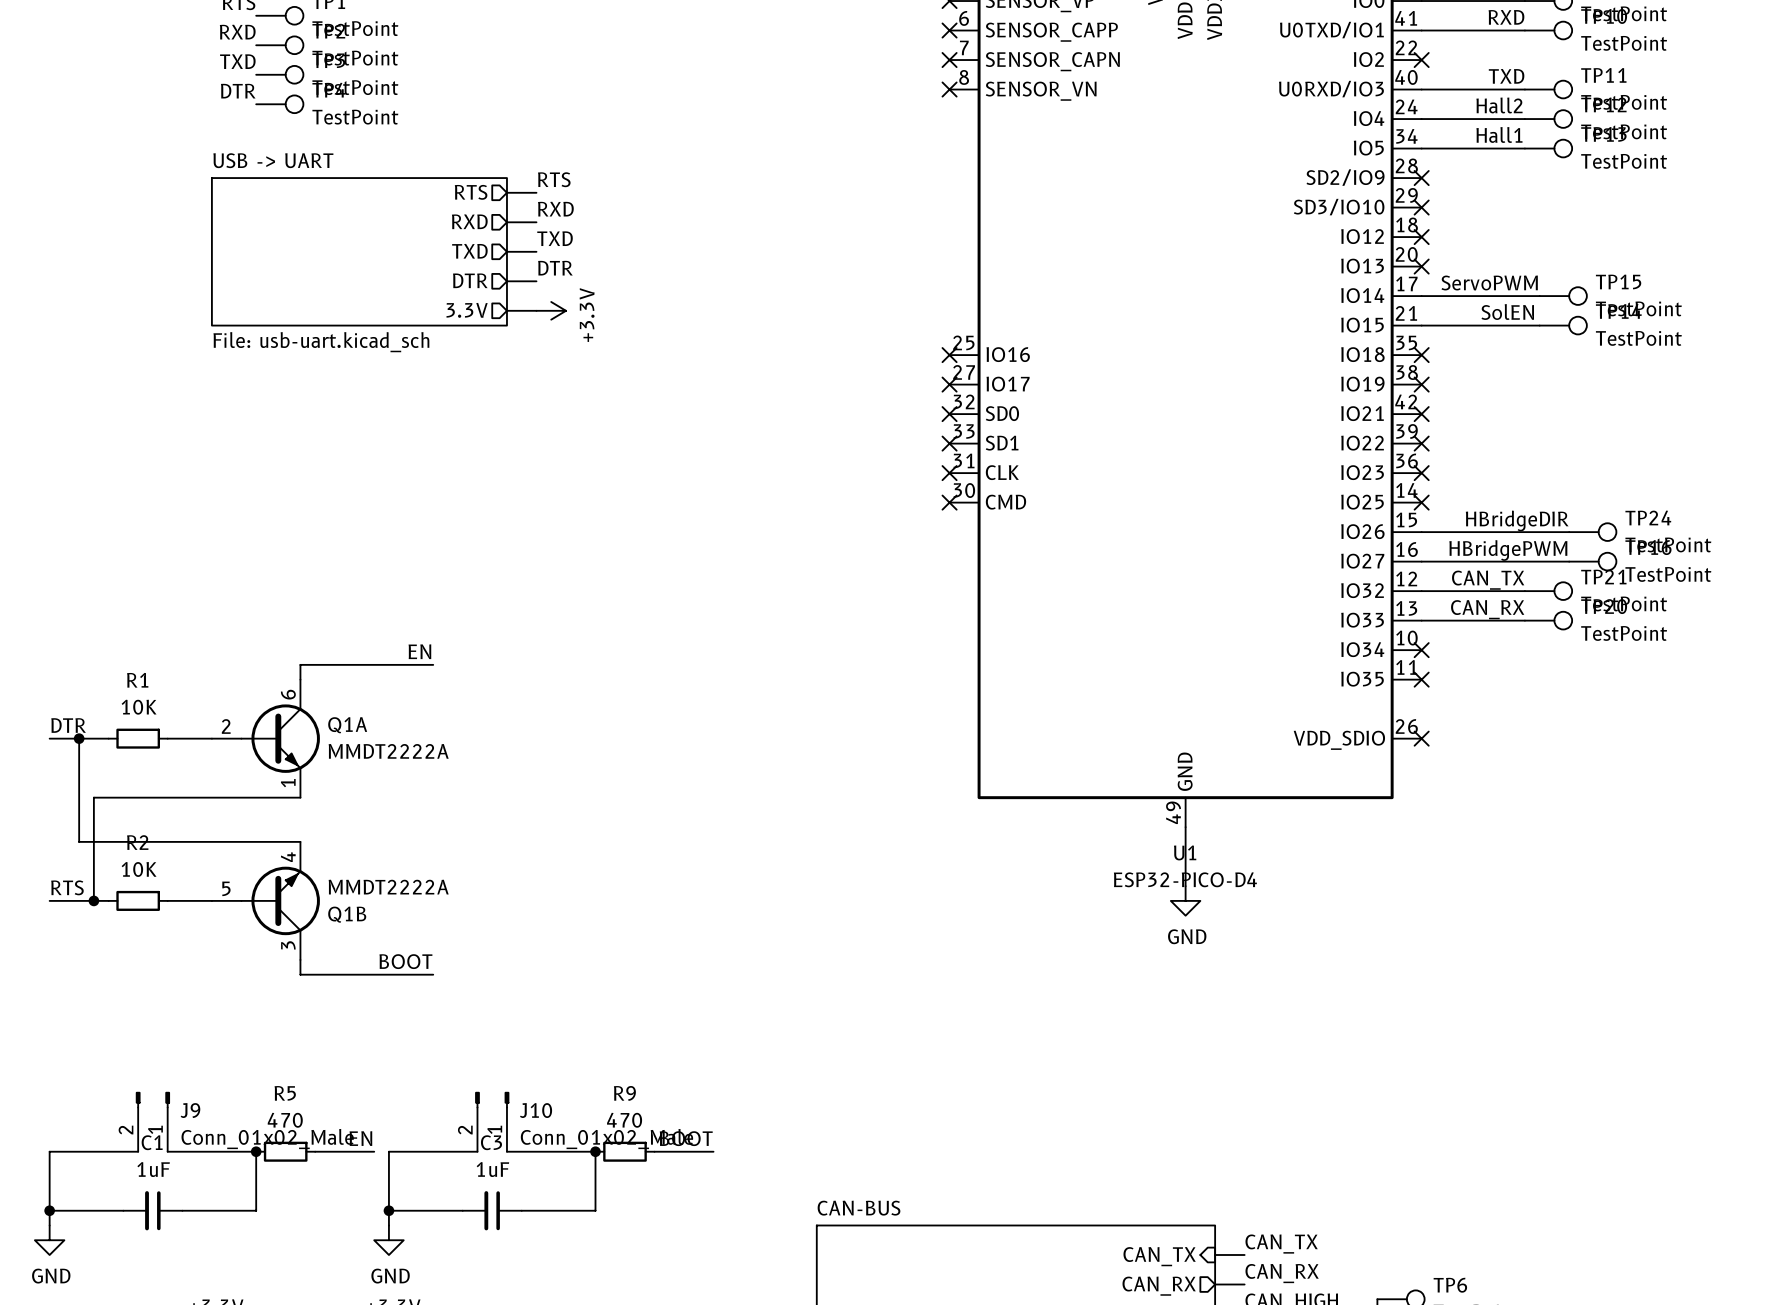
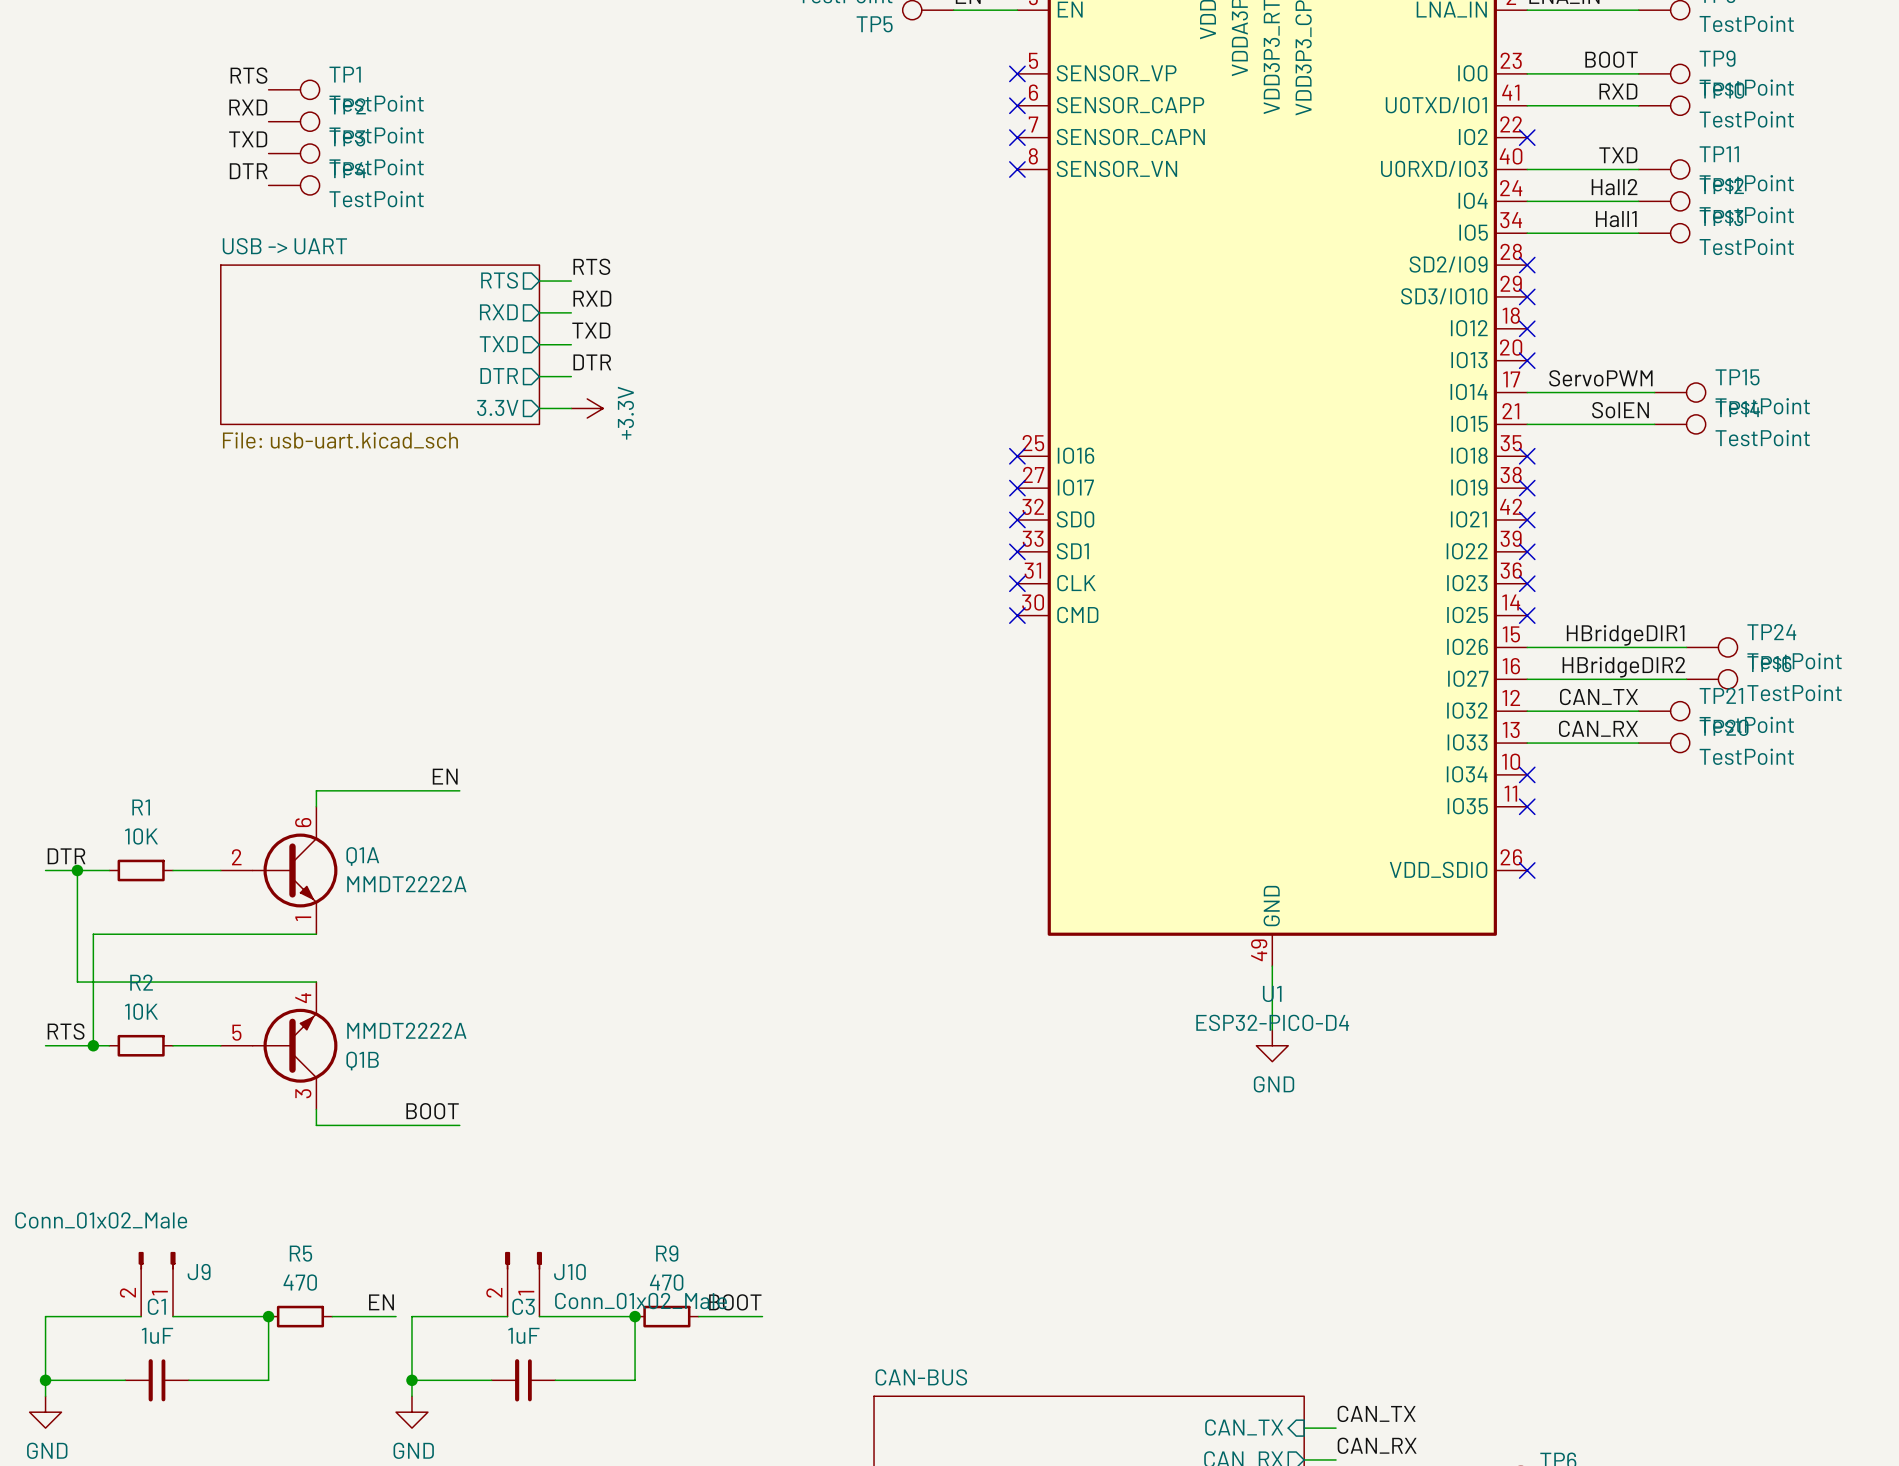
label: HBridgeDIR (1517, 520) -> HBridgeDIR1 (1625, 635)
label: HBridgePWM (1508, 550) -> HBridgeDIR2 (1623, 667)
J9 value position: Conn_01x02_Male (267, 1139) -> Conn_01x02_Male (101, 1220)

